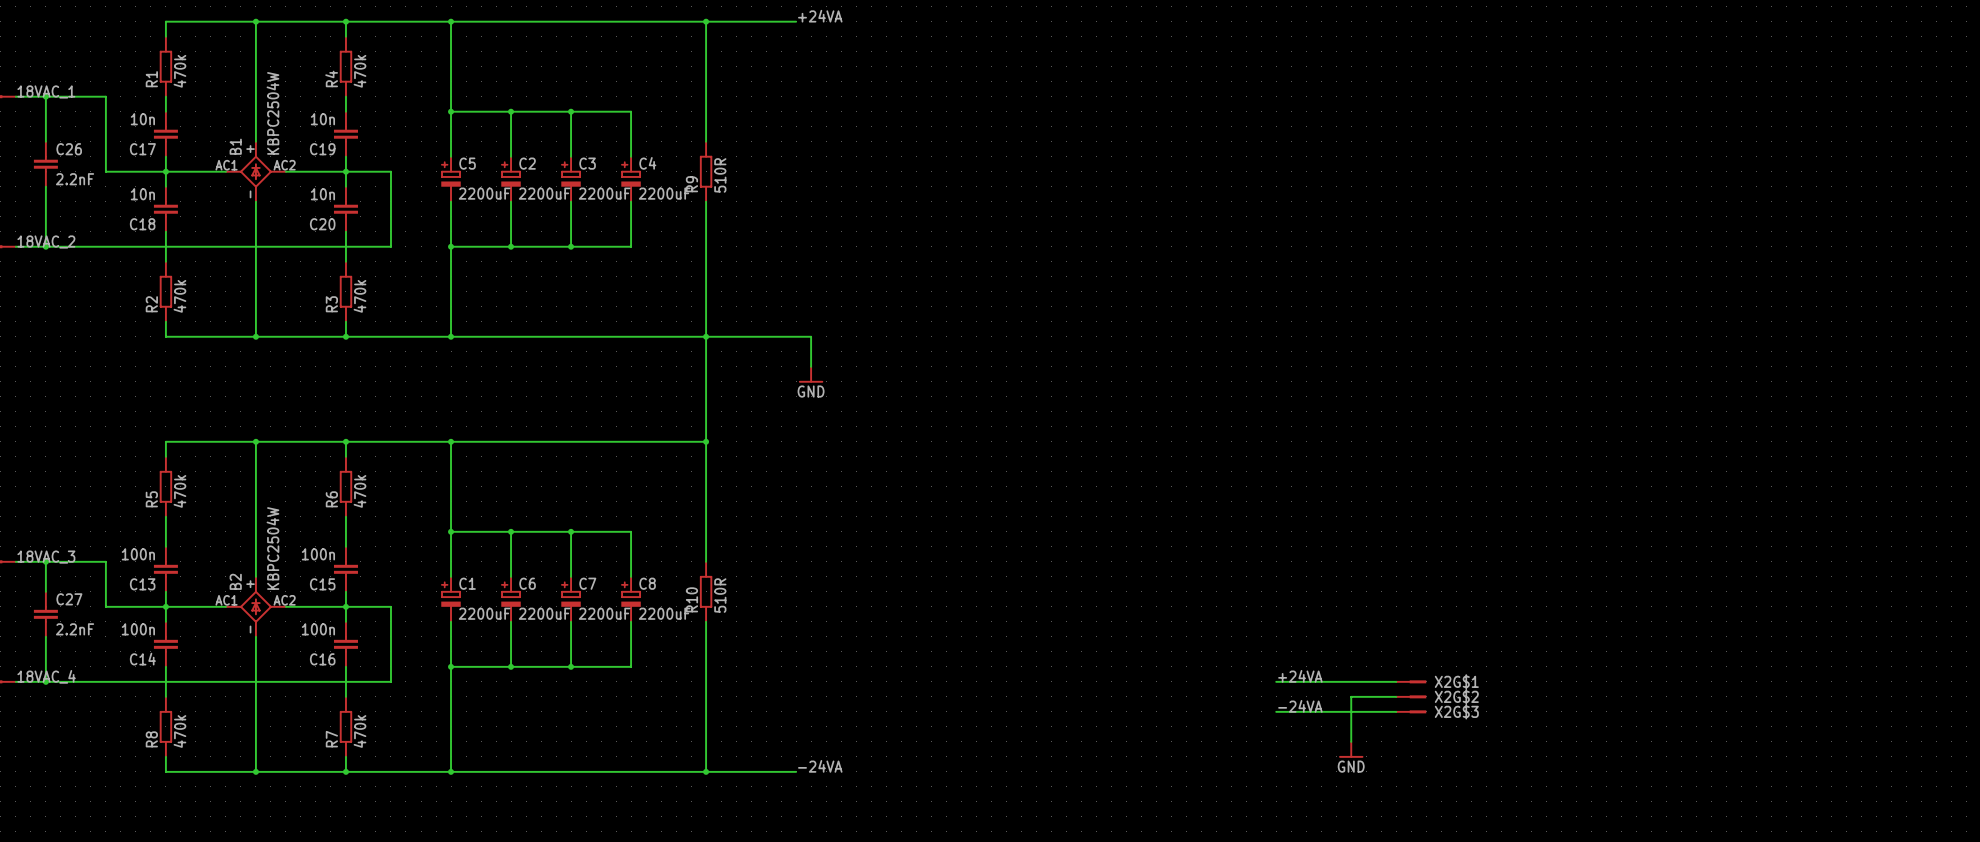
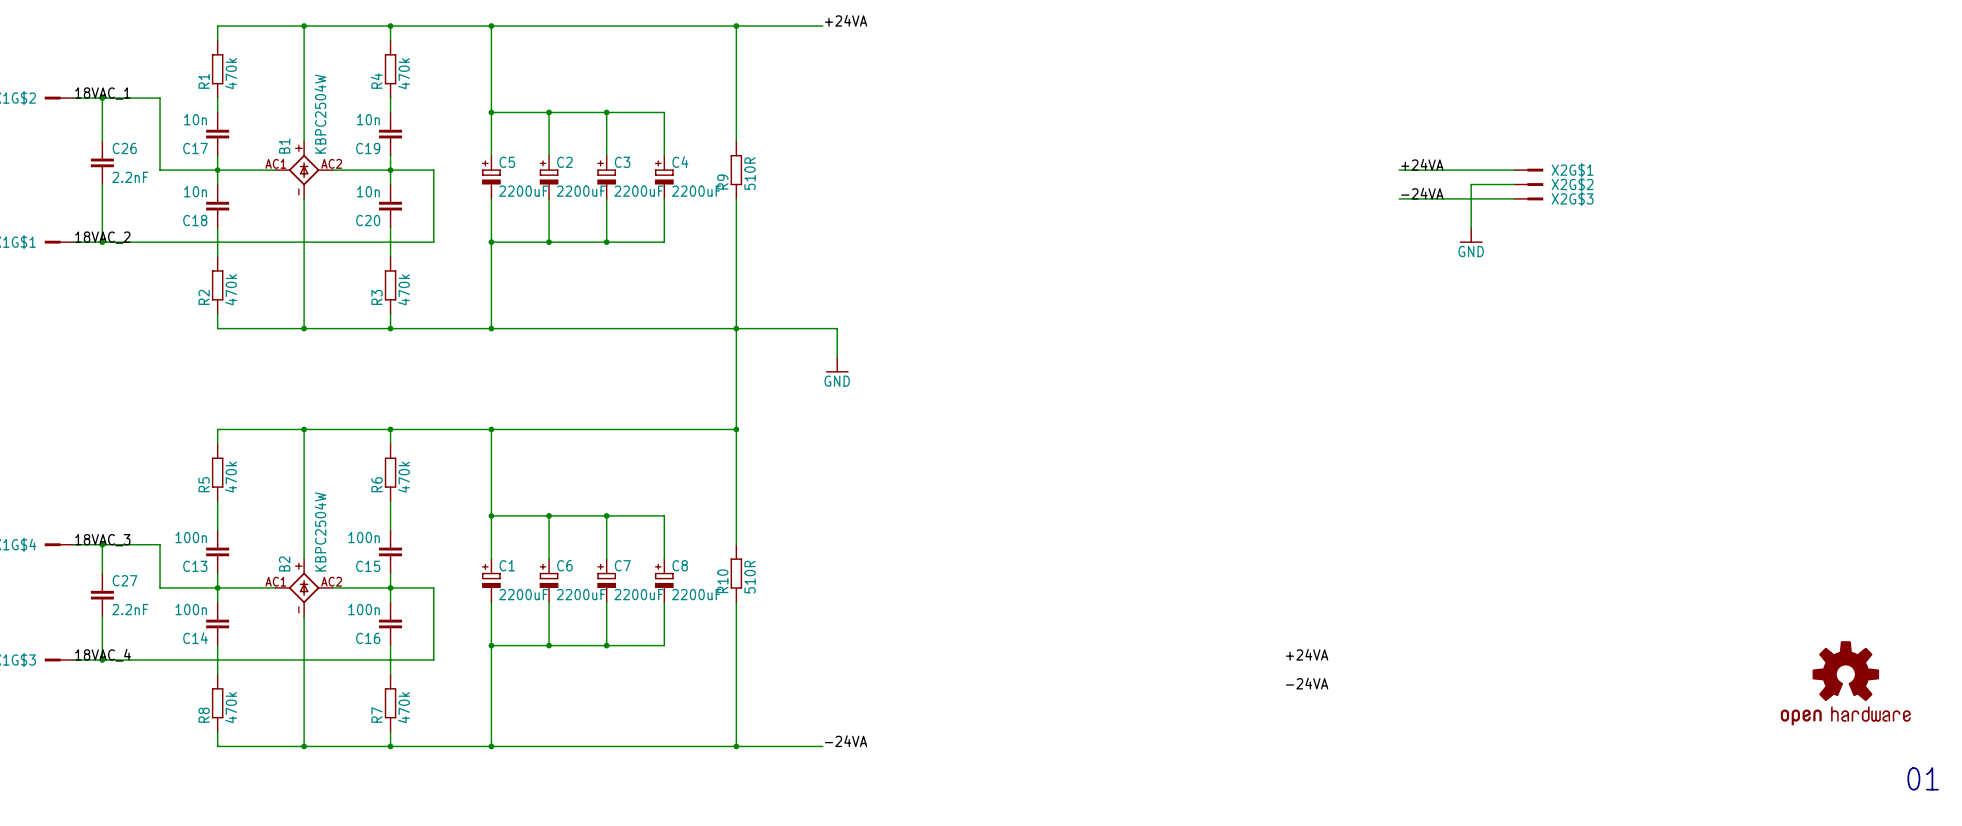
label: none -> +24VA (1422, 164)
wire: none -> (1399, 170) (1514, 170)
wire: none -> (1514, 184) (1471, 184) (1471, 227)
label: none -> -24VA (1422, 193)
wire: none -> (1399, 198) (1514, 198)
power symbol: none -> GND (1471, 235)
wire: (1276, 681) (1396, 681) -> none
X2G$1 position: (1411, 681) -> (1528, 170)
wire: (1396, 696) (1351, 696) (1351, 741) -> none
X2G$2 position: (1411, 696) -> (1528, 184)
part: none -> (1845, 683)
wire: (1276, 711) (1396, 711) -> none
X2G$3 position: (1411, 711) -> (1528, 198)
power symbol: GND (1351, 749) -> none
text: none -> 01 (1923, 778)

